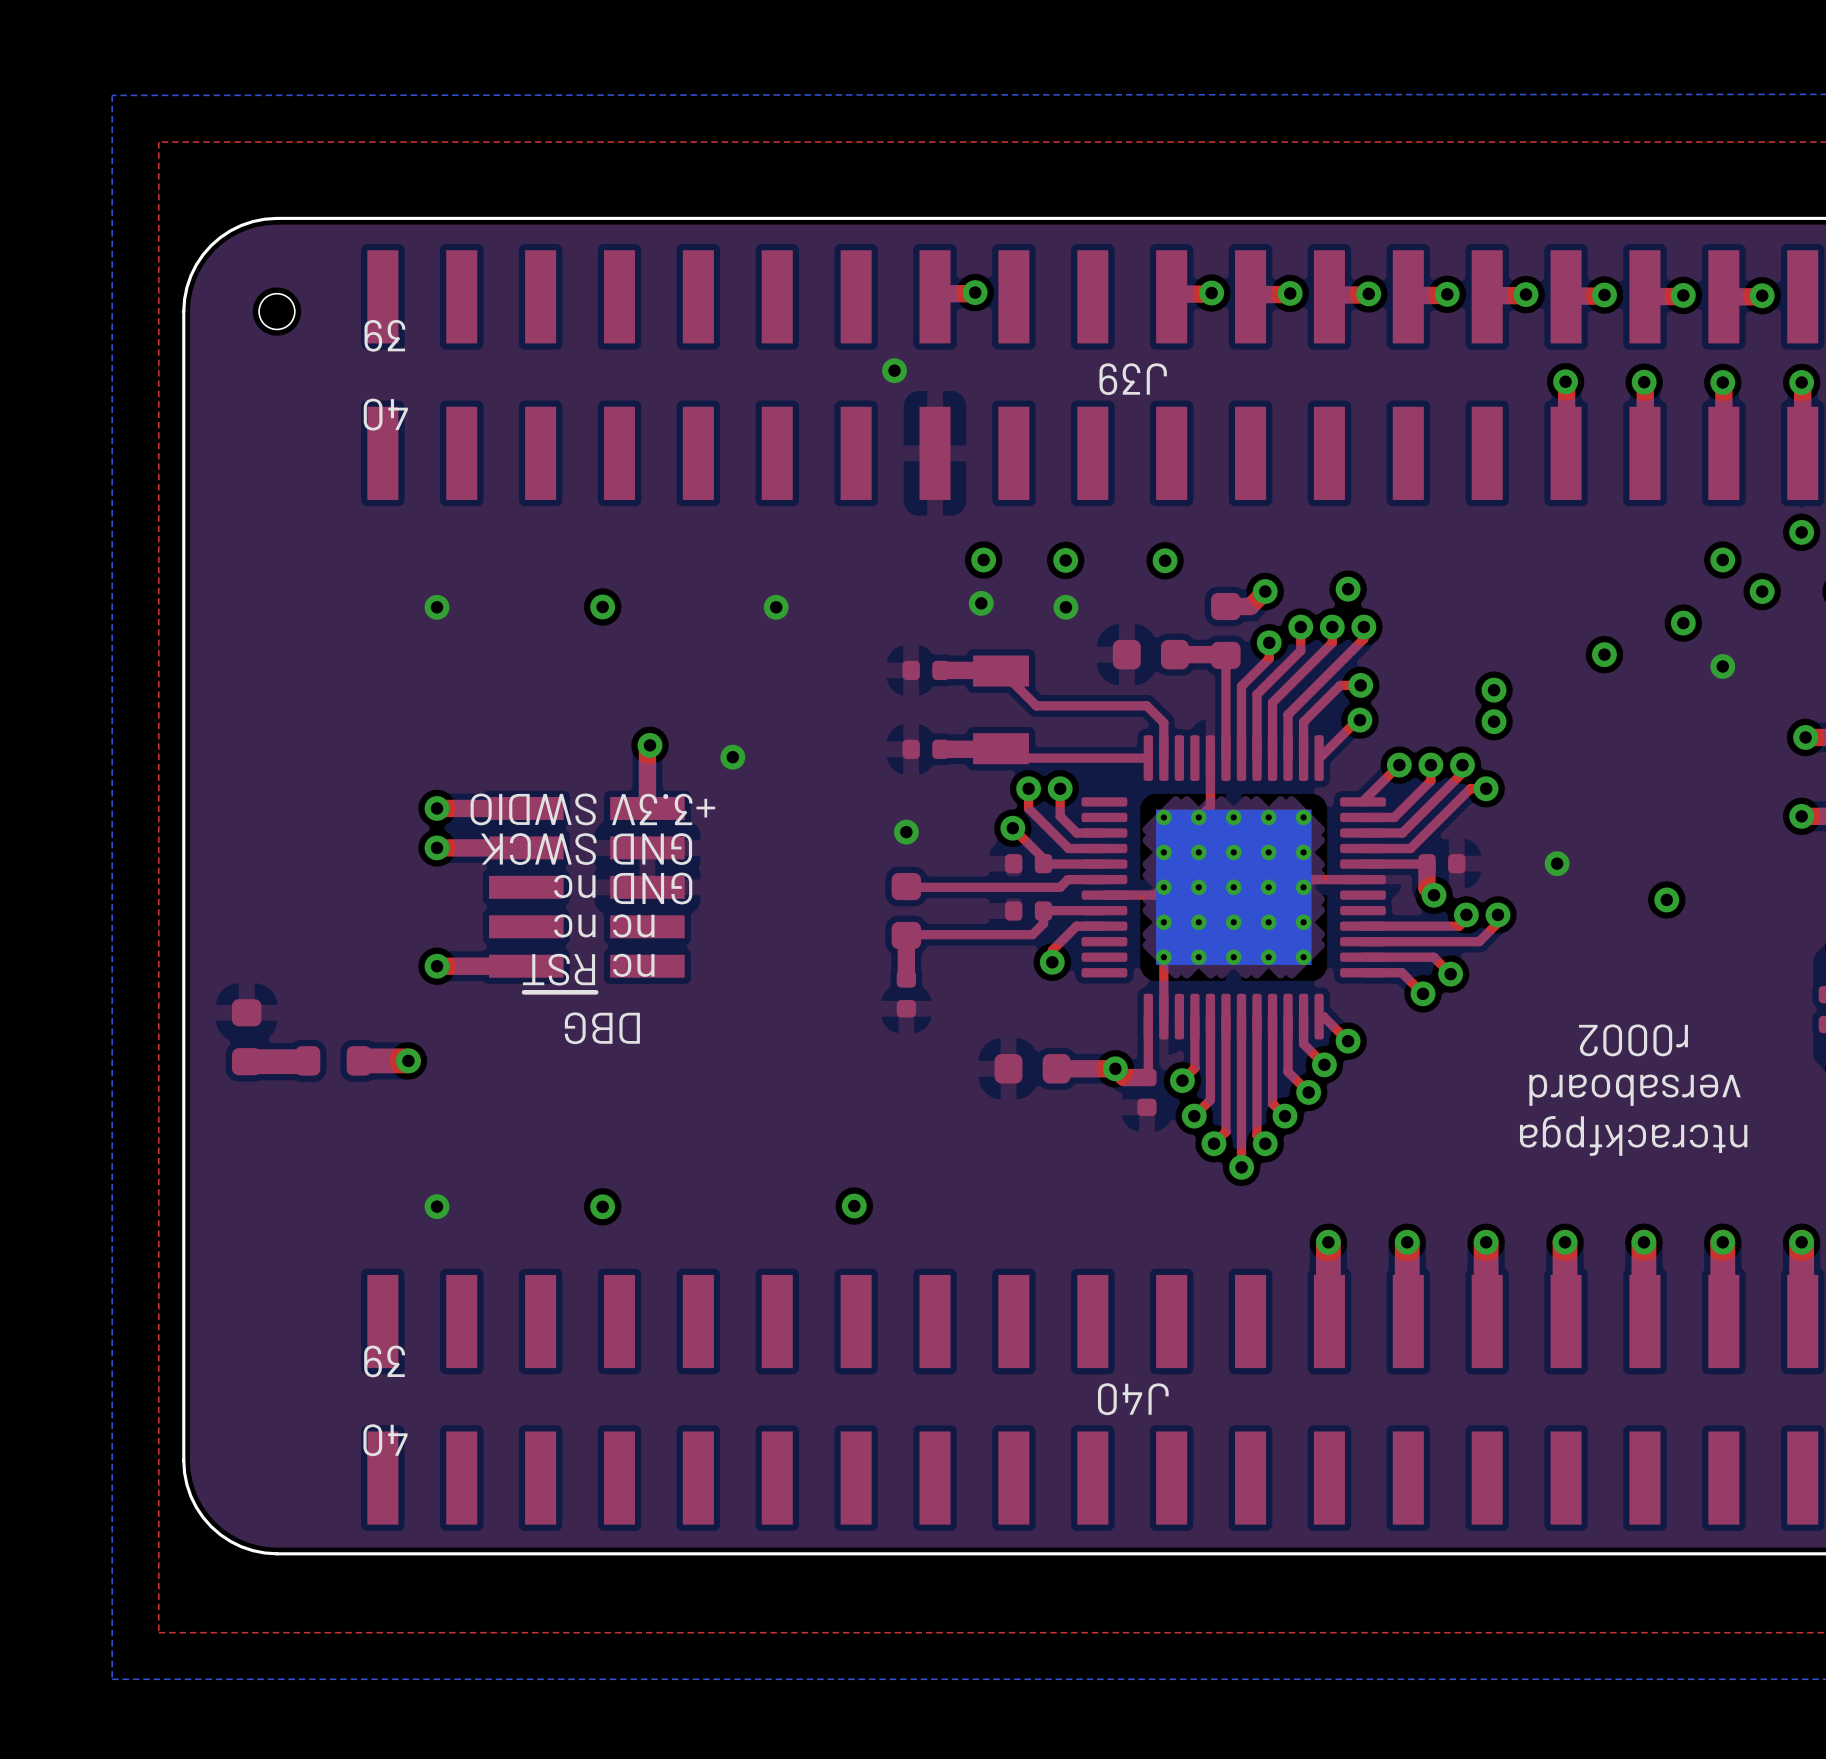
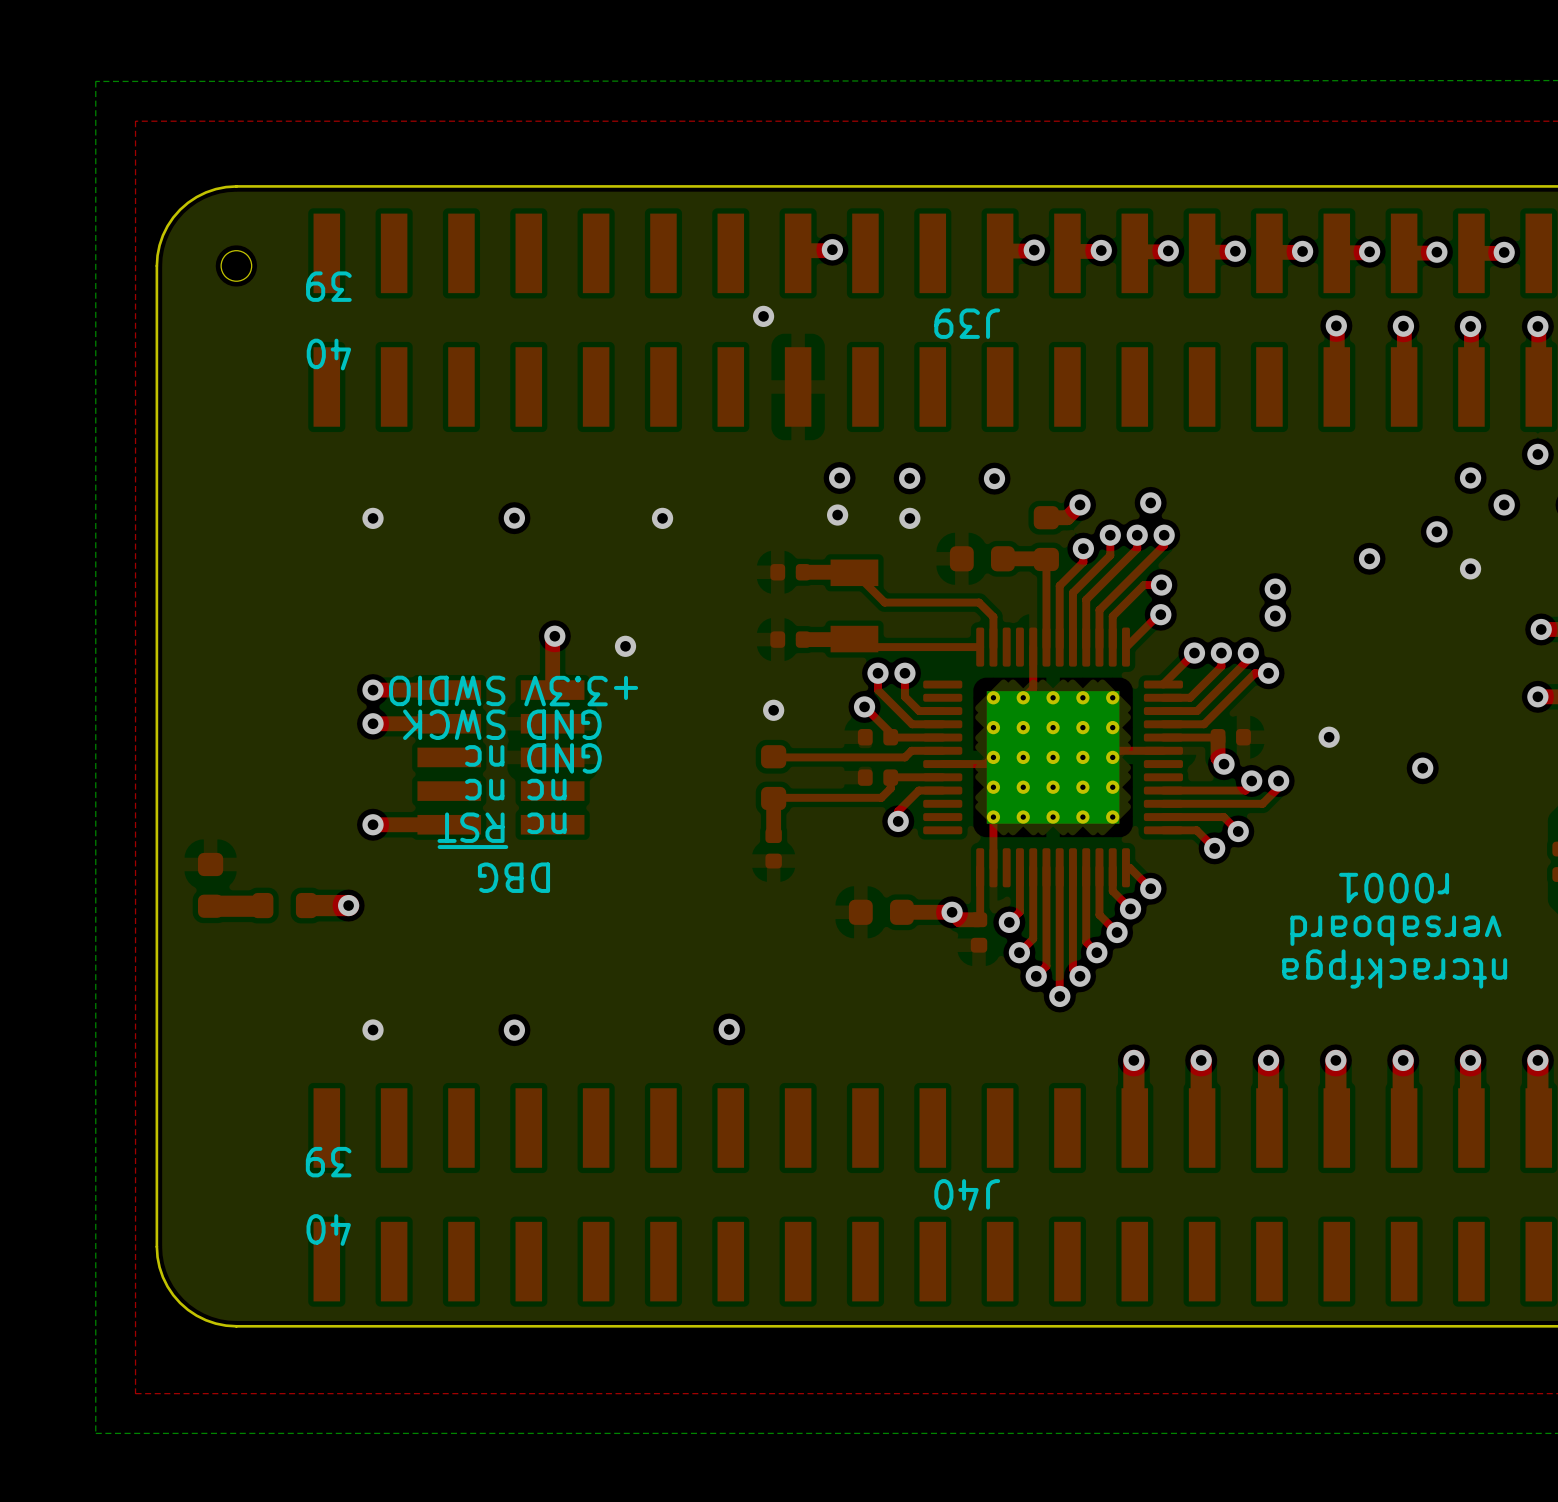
text: r0002 (1633, 1040) -> r0001 (1394, 888)

